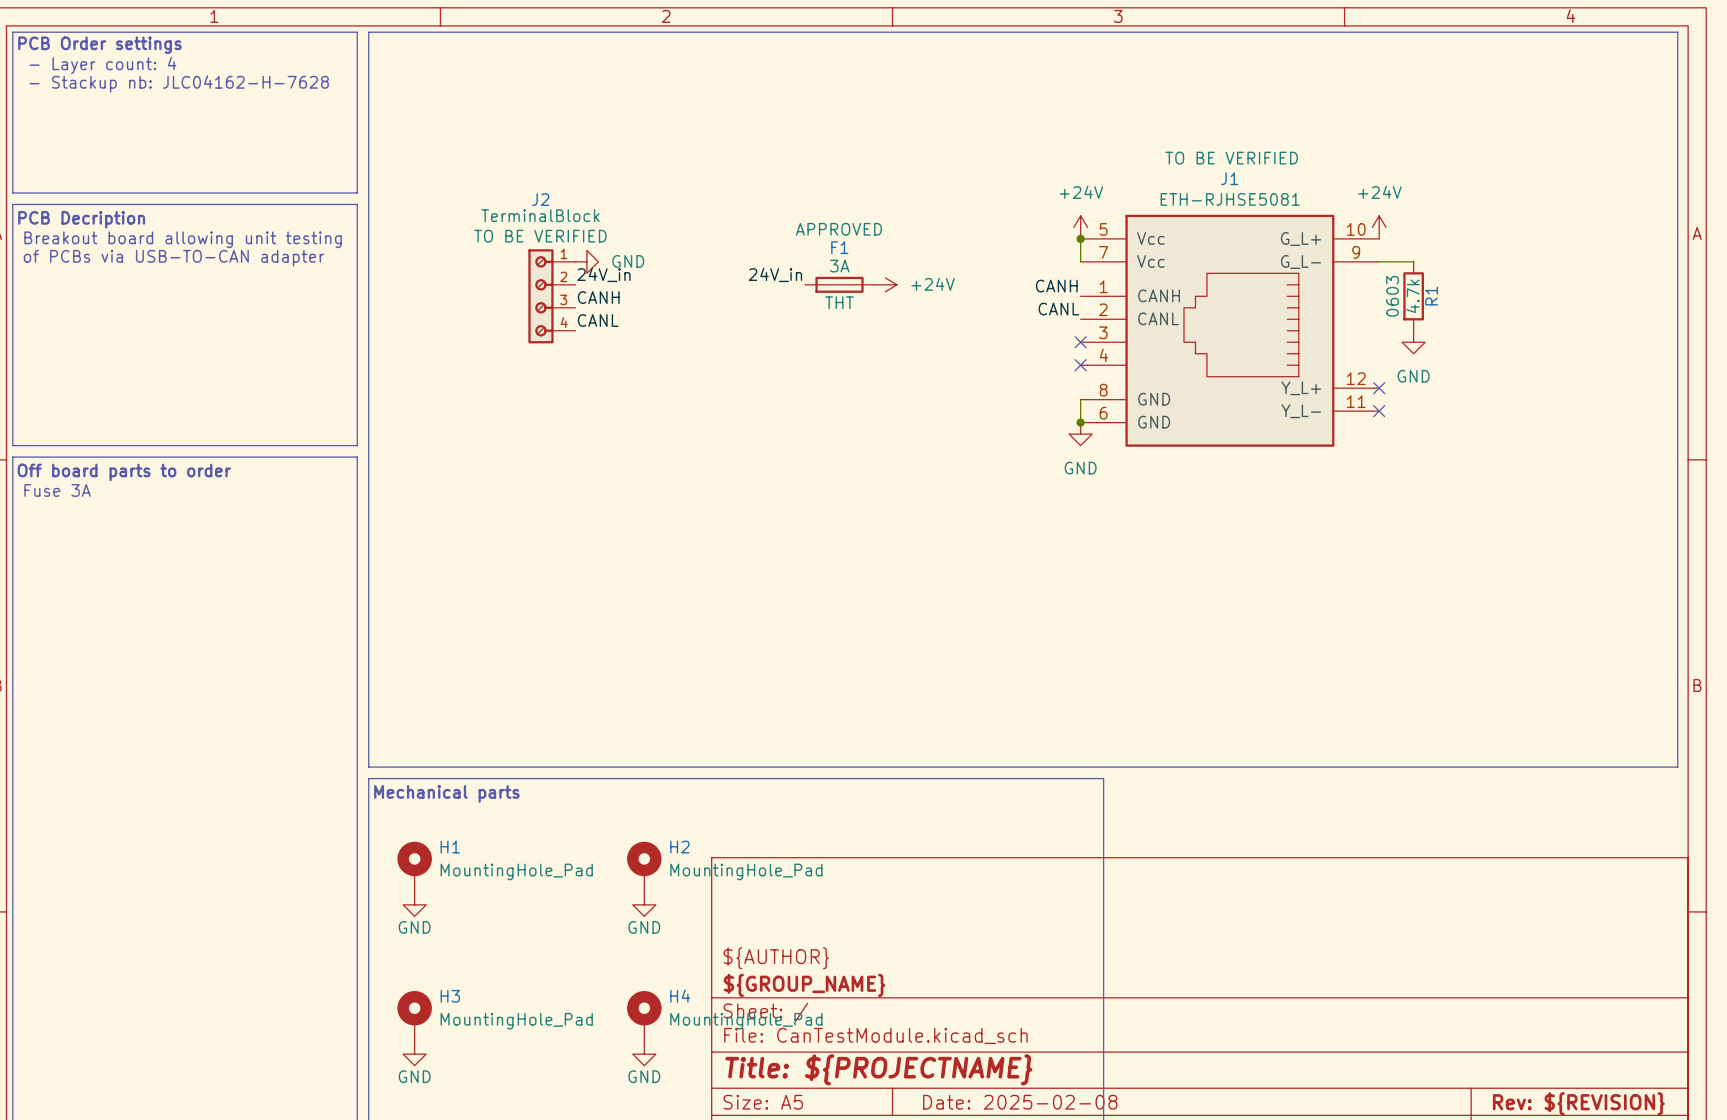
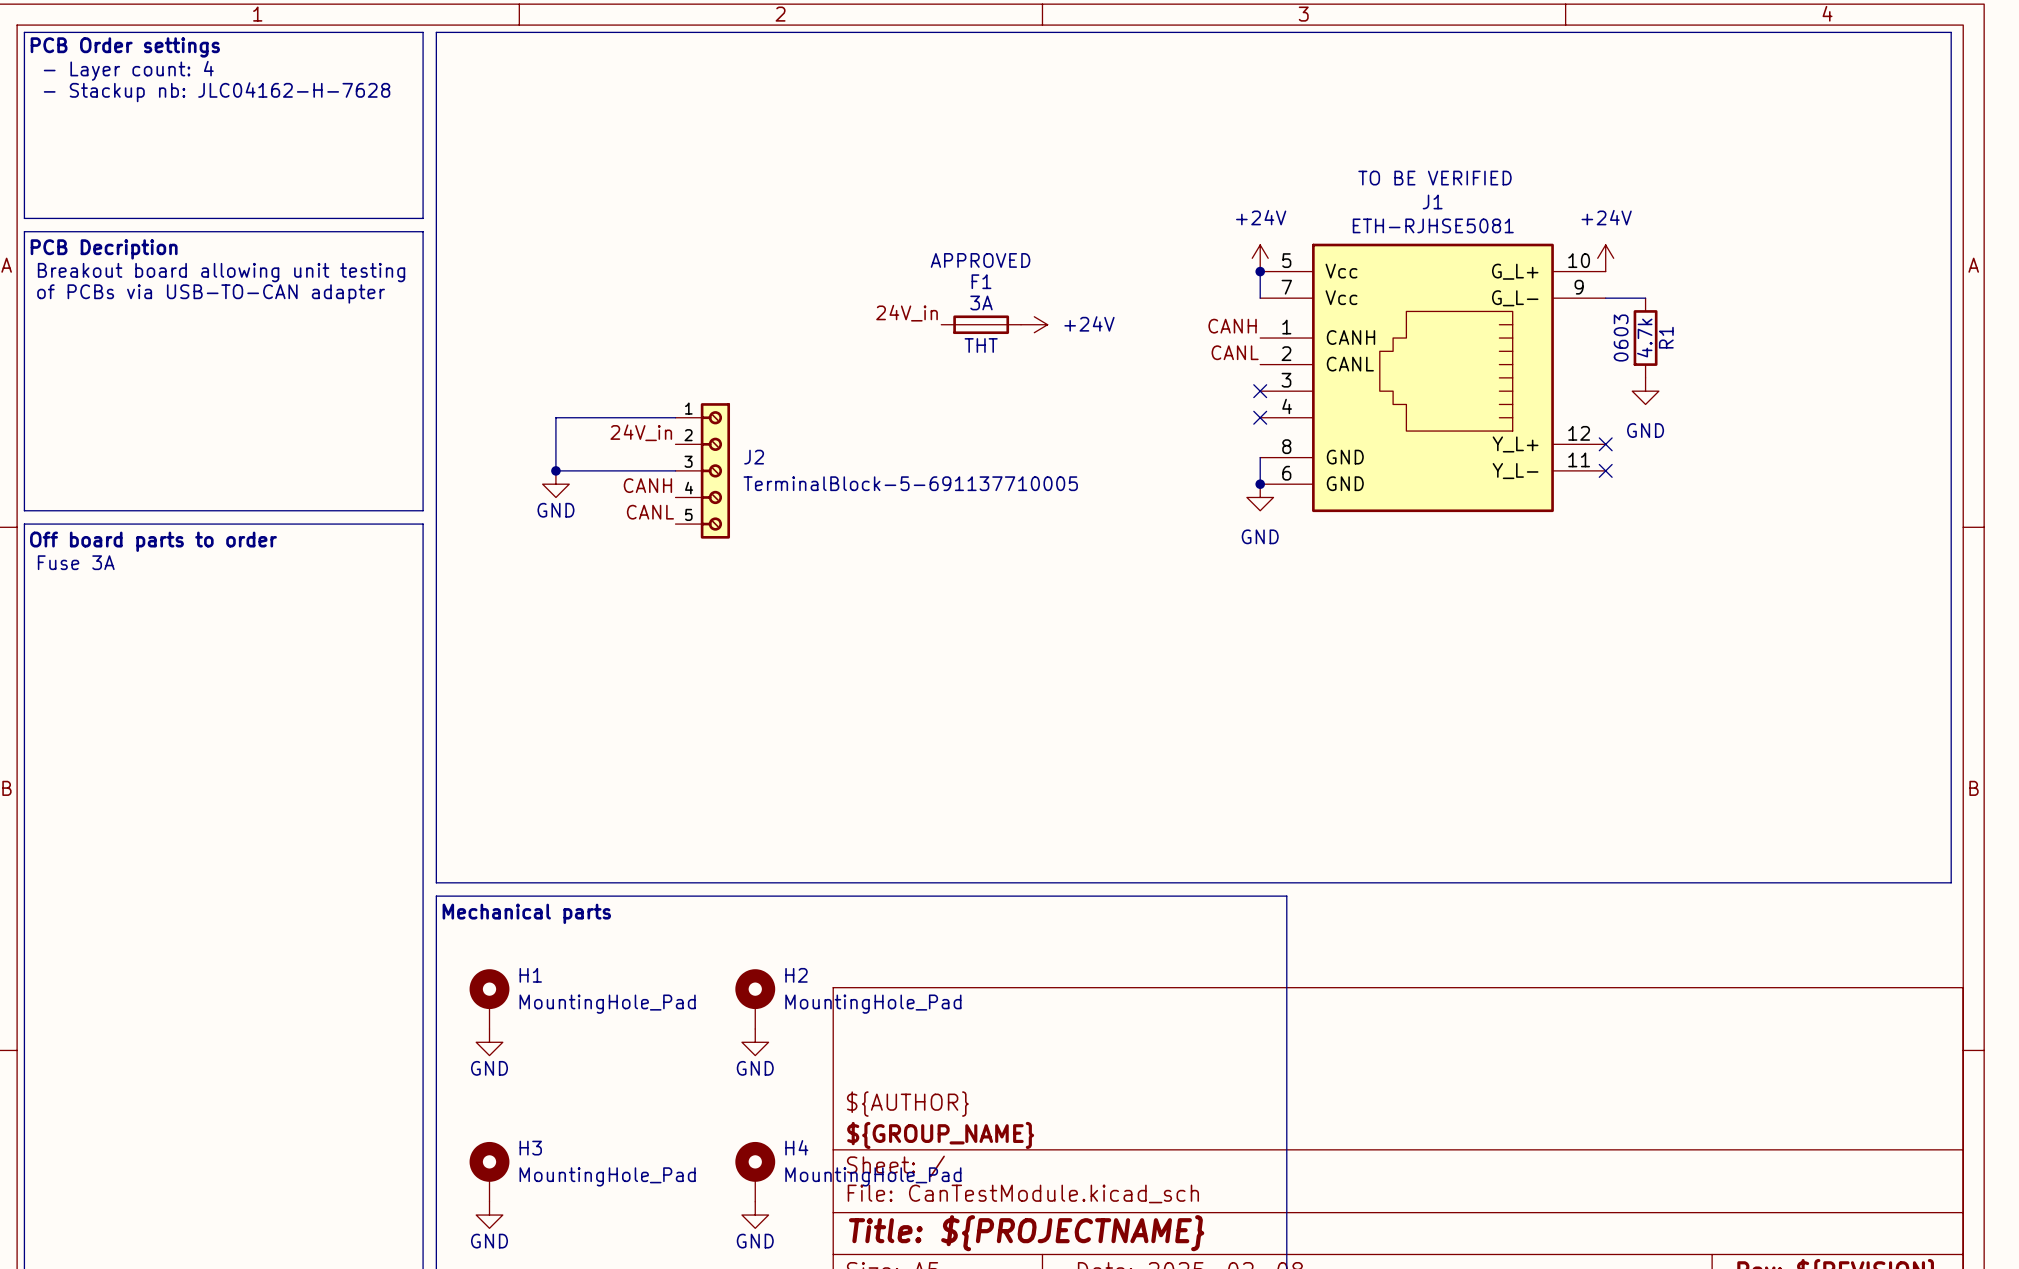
J2 name position: J2 (540, 199) -> J2 (754, 457)
J2 value: TerminalBlock (540, 215) -> TerminalBlock-5-691137710005 (910, 483)
J2 text: TO BE VERIFIED (540, 236) -> none
J2 symbol: [528, 249, 576, 344] -> [675, 403, 731, 539]
power symbol rotation: 0° (586, 261) -> 90° clockwise (555, 484)
power symbol position: GND (586, 261) -> GND (555, 484)
power symbol text position: GND (628, 261) -> GND (555, 510)
label position: 24V_in (603, 274) -> 24V_in (641, 432)
label position: CANH (598, 297) -> CANH (647, 485)
label position: CANL (598, 320) -> CANL (650, 512)
wire: none -> (675, 417) (555, 417) (555, 470) (675, 470)
junction: none -> (555, 470)

